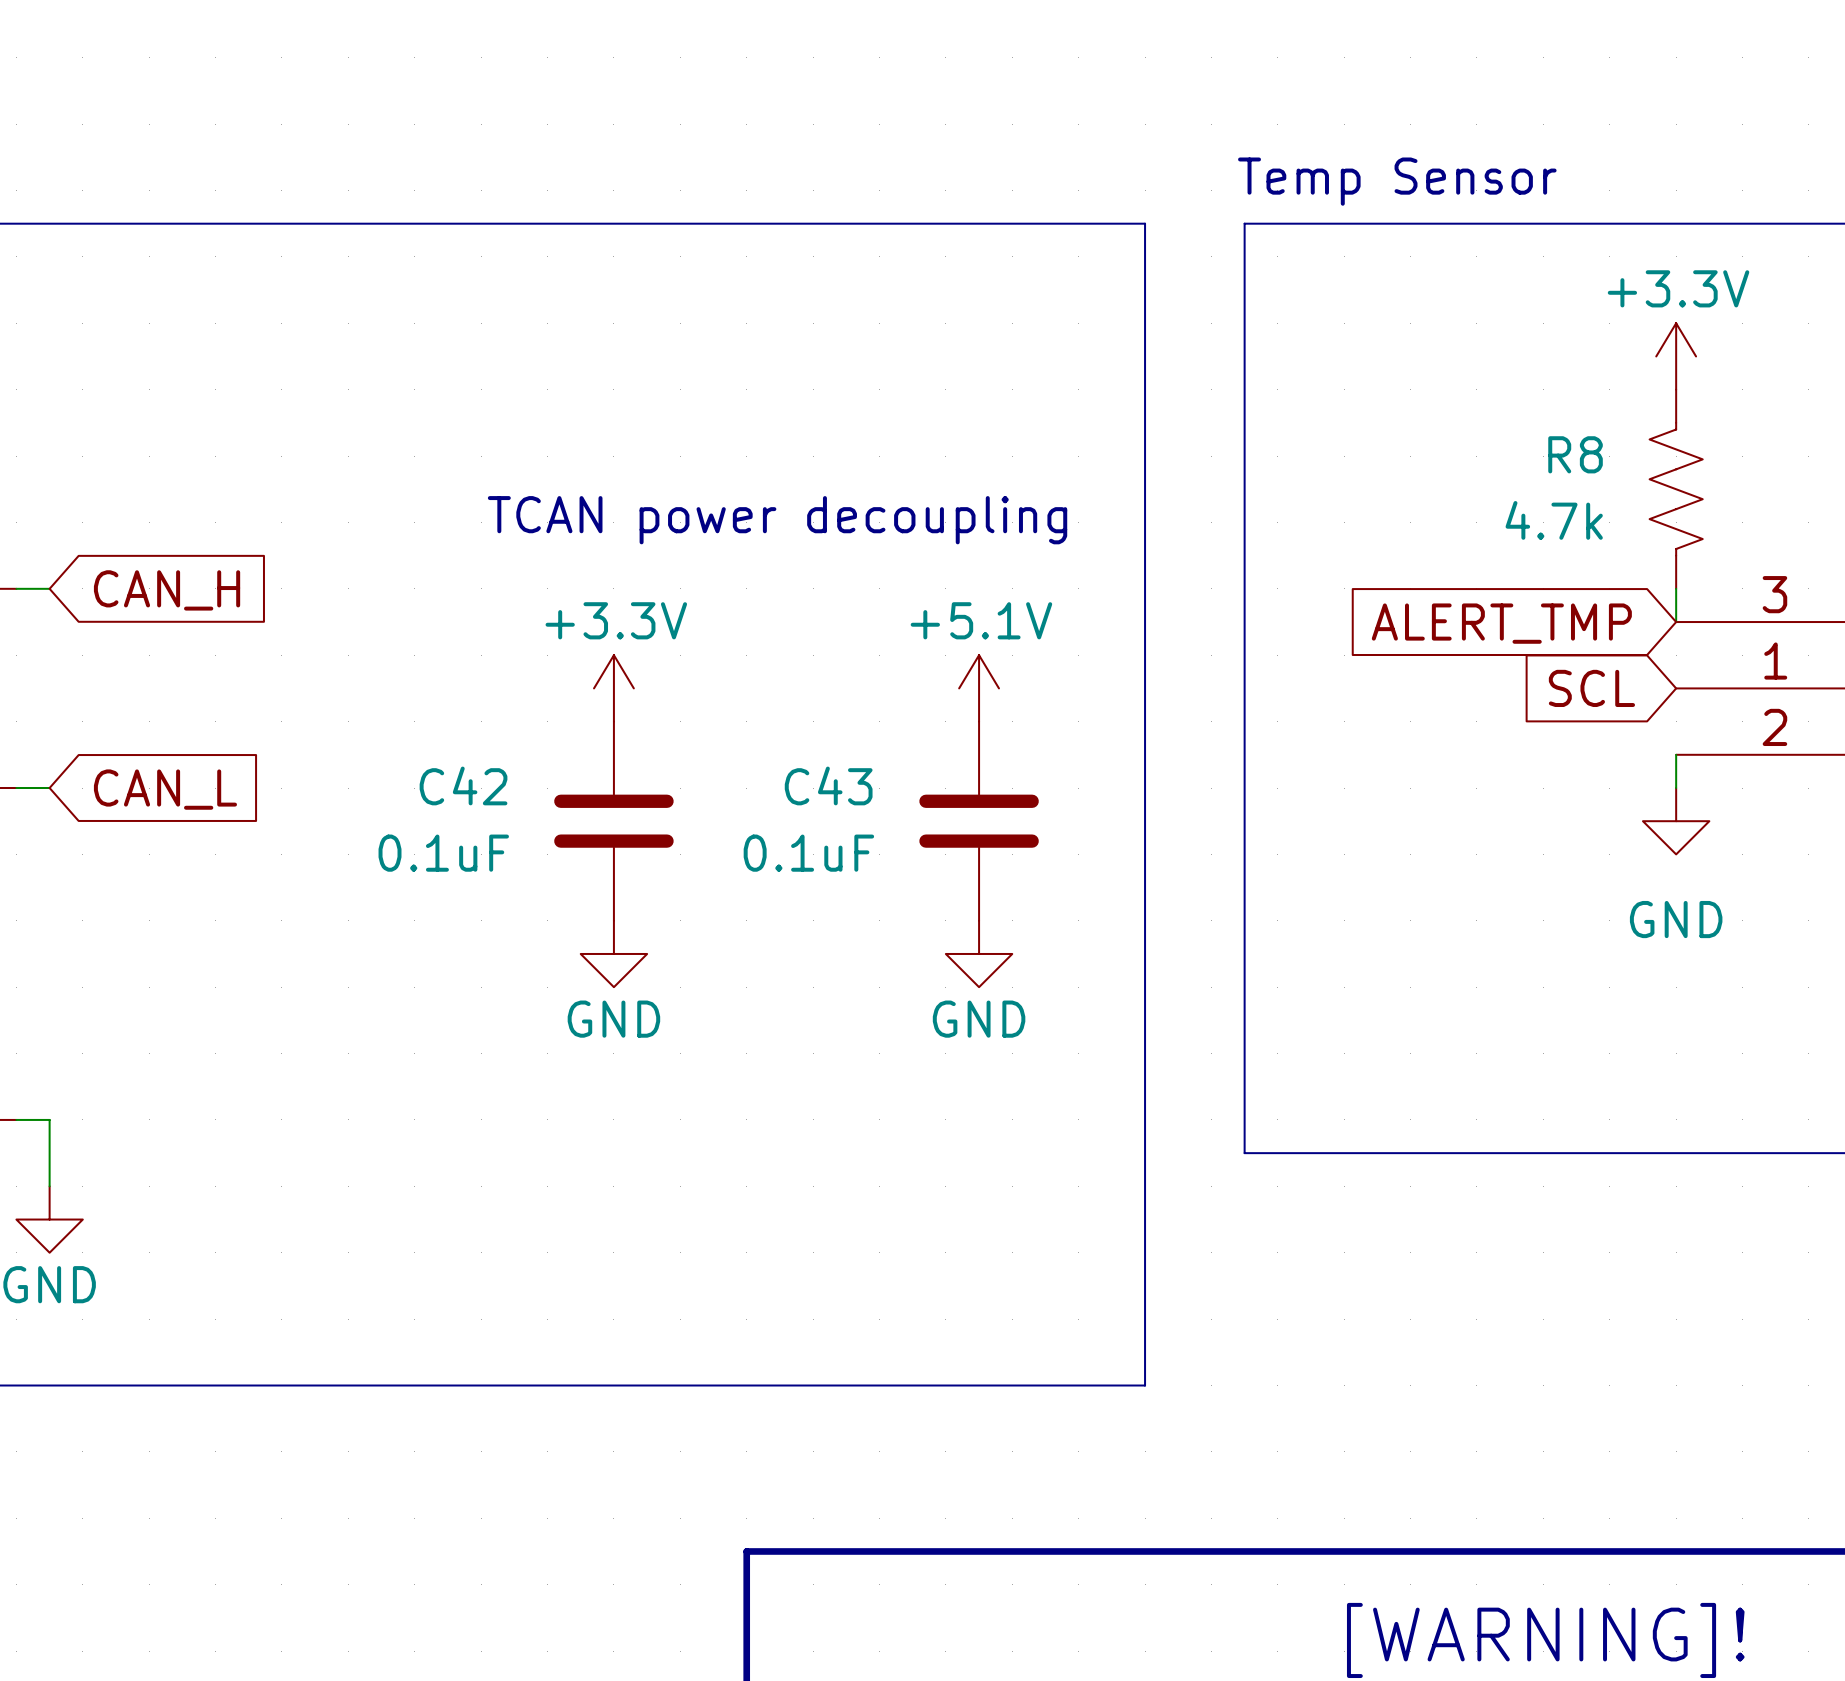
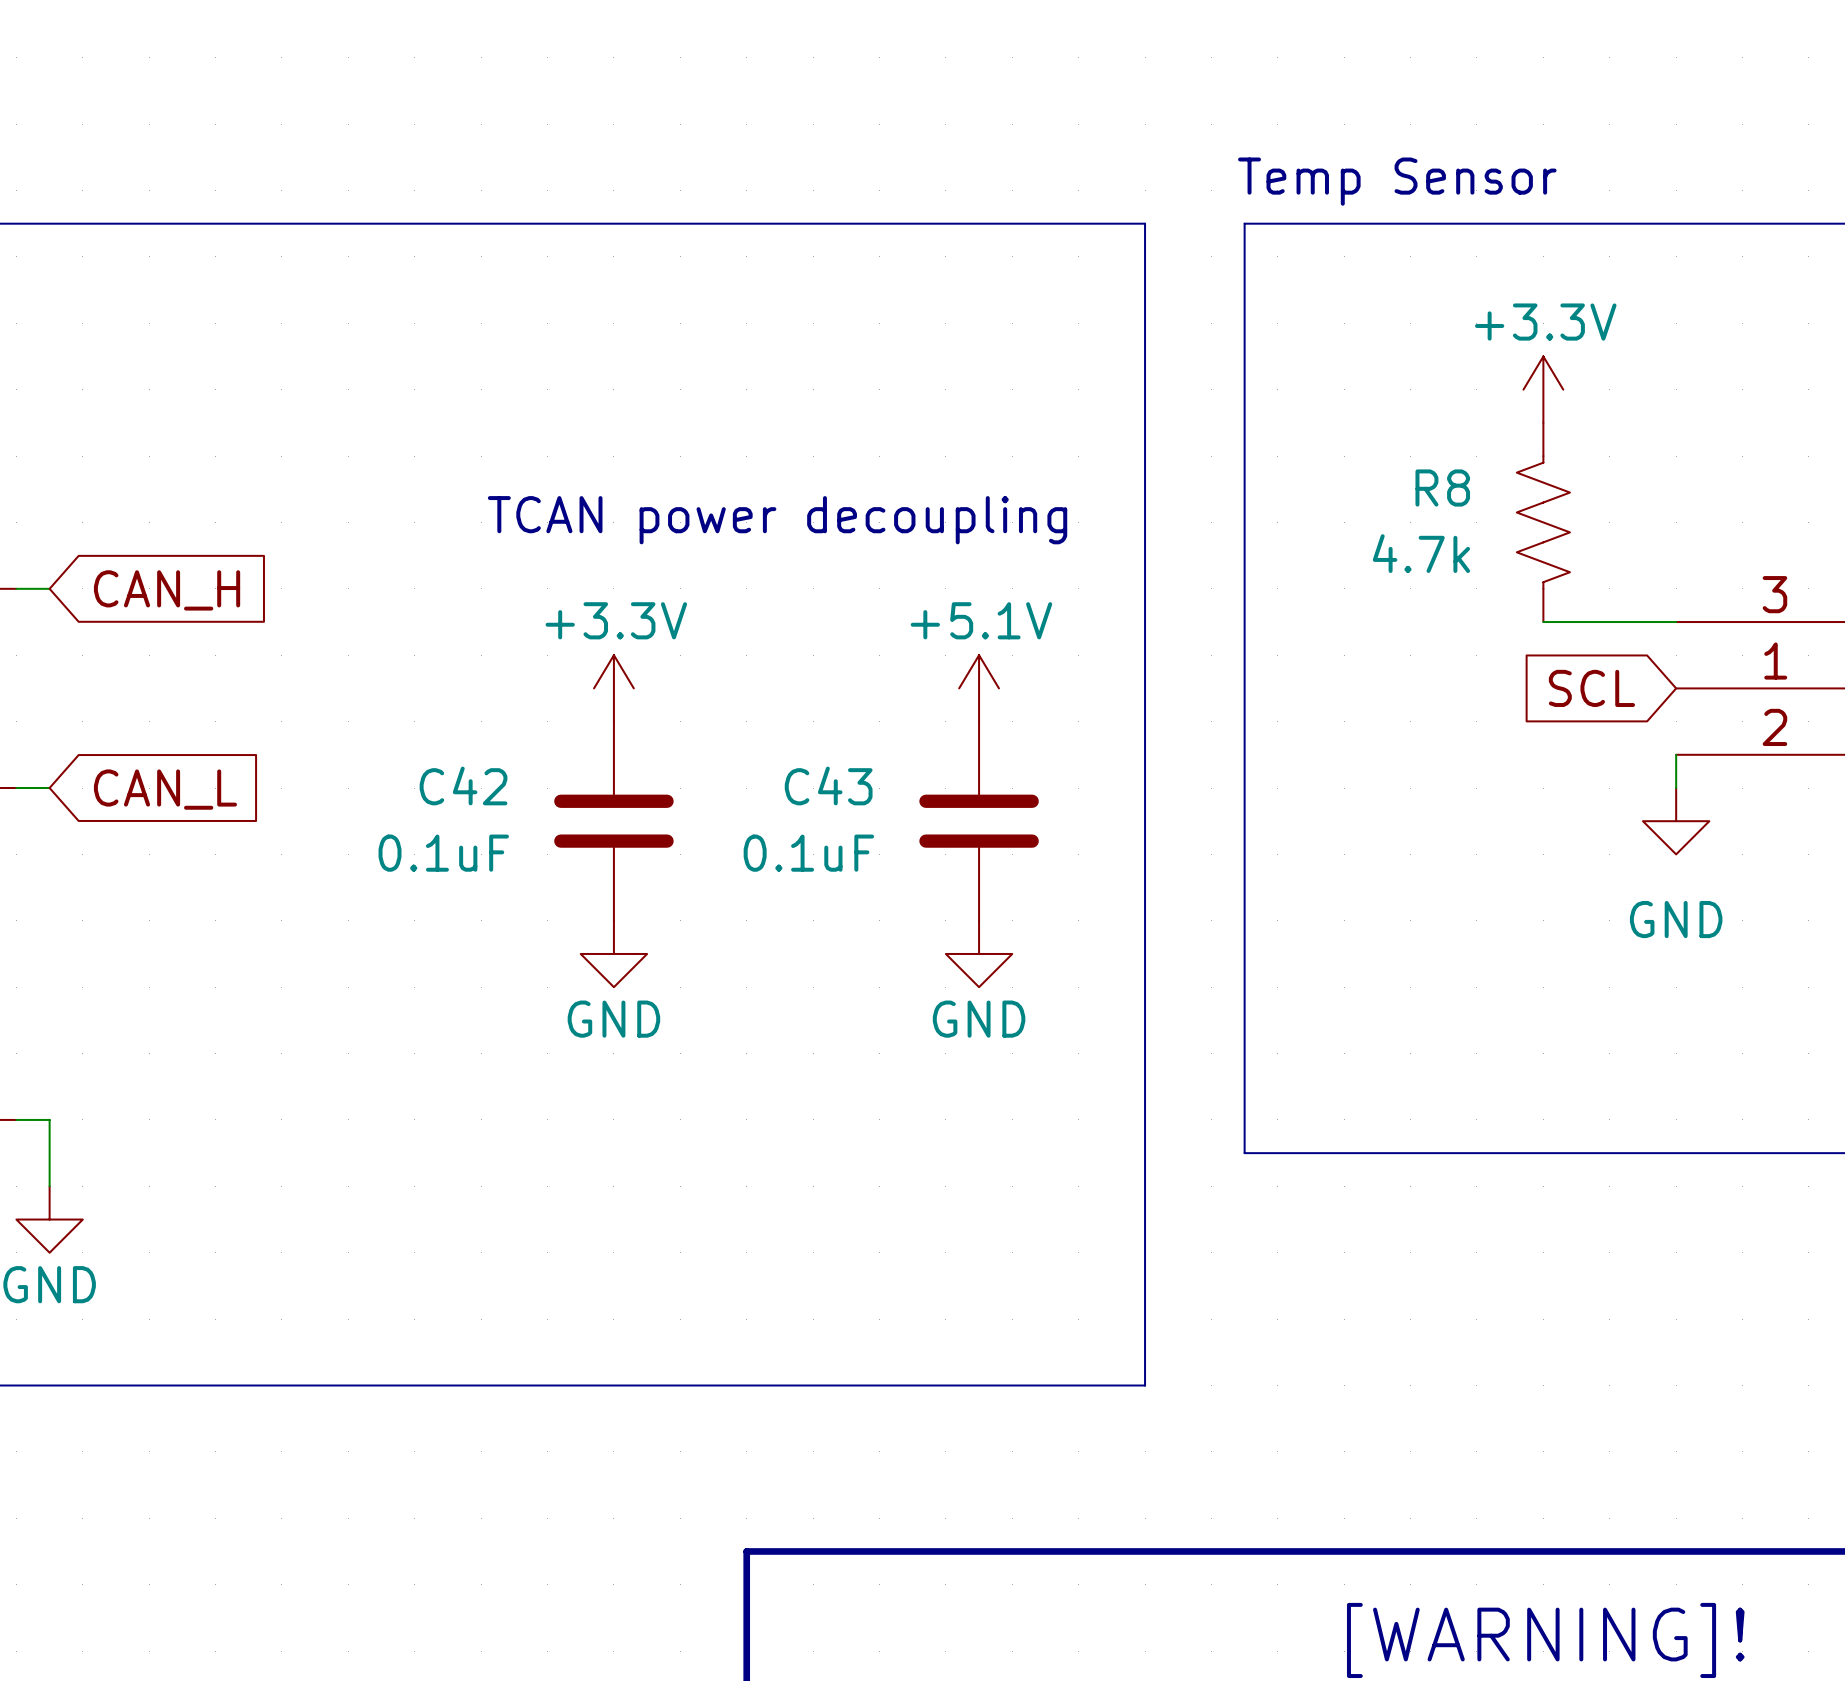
power symbol position: +3.3V (1676, 356) -> +3.3V (1543, 389)
R8 position: (1676, 489) -> (1543, 522)
wire: (1676, 588) (1676, 622) -> (1543, 622) (1676, 622)
global label: ALERT_TMP (1501, 623) -> none

